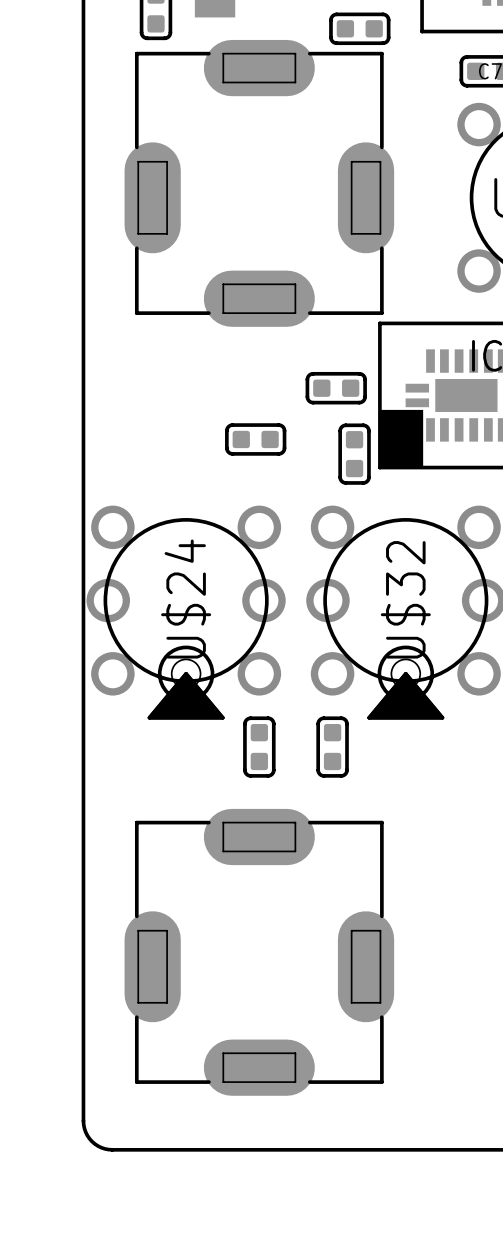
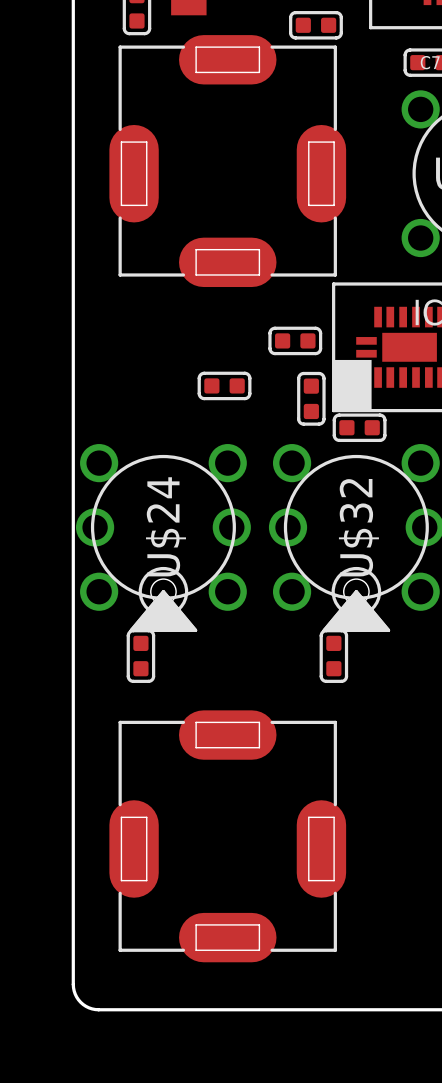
part: none -> (359, 427)
part: none -> (140, 656)
part: (259, 747) -> none
part position: (332, 747) -> (333, 656)

